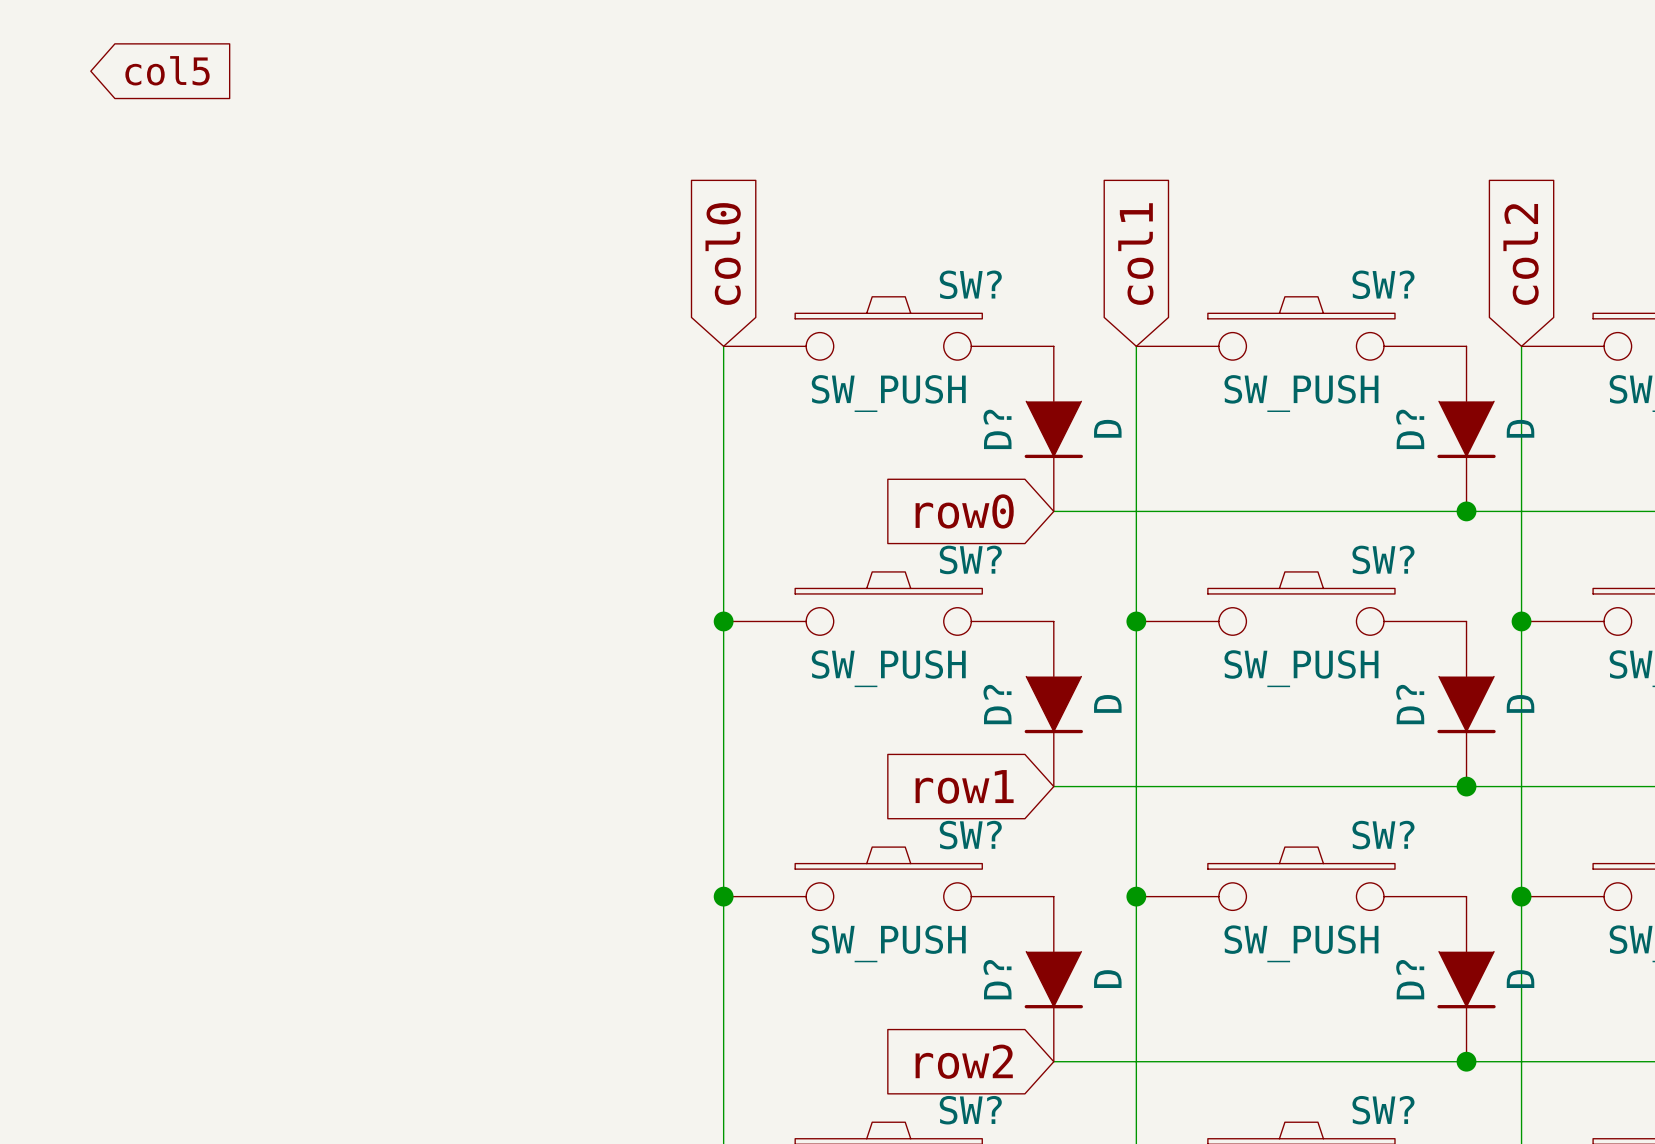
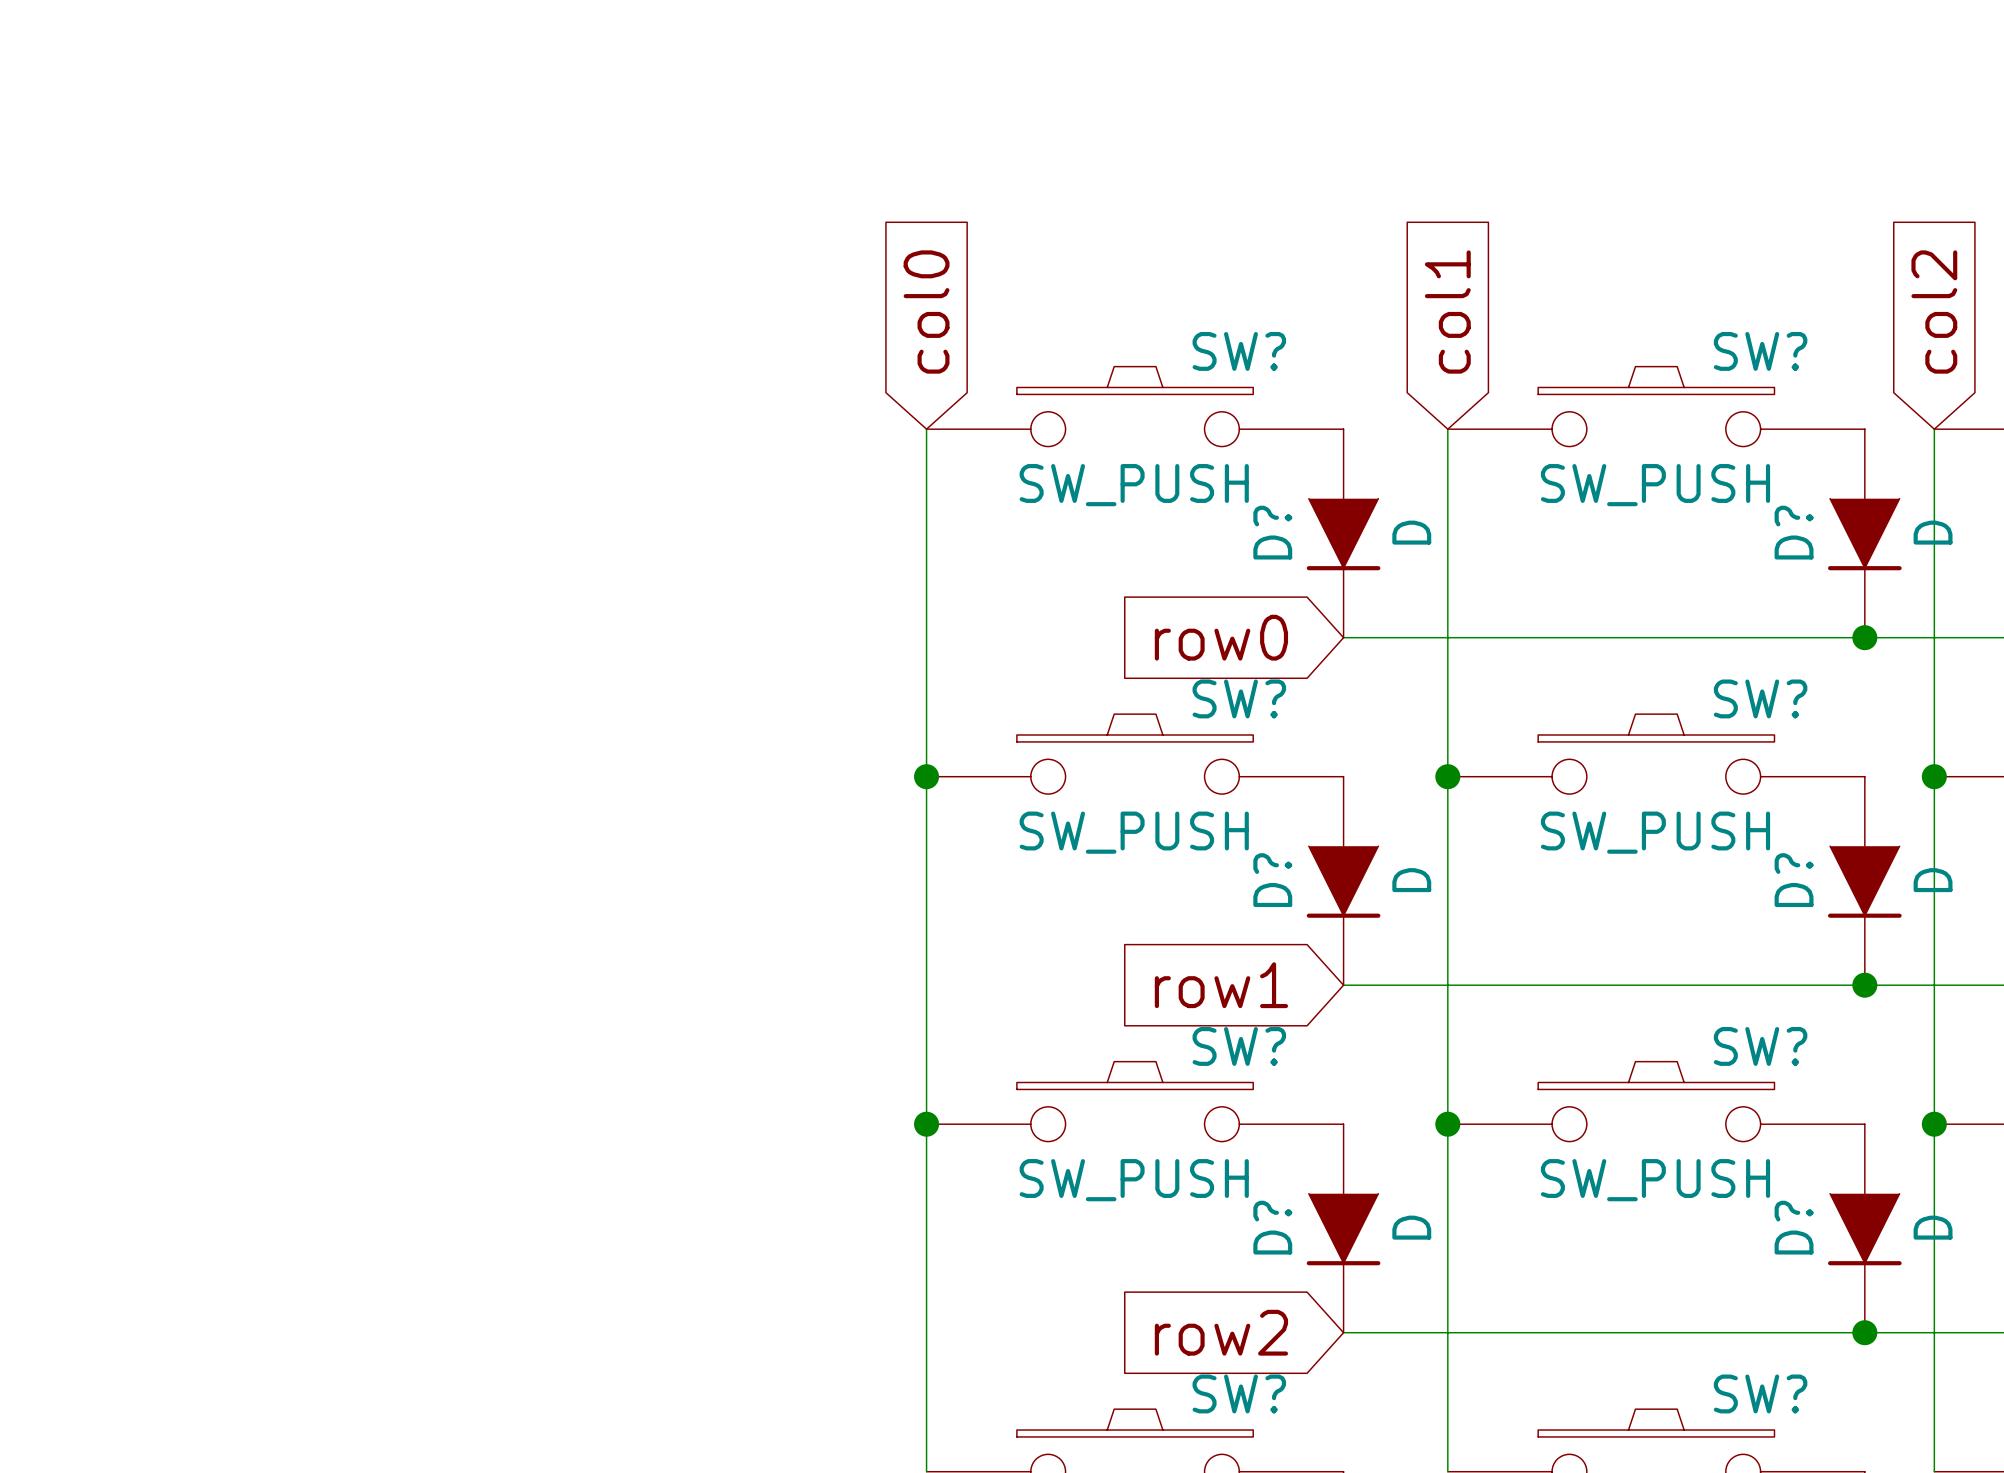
global label: col5 (167, 70) -> none

